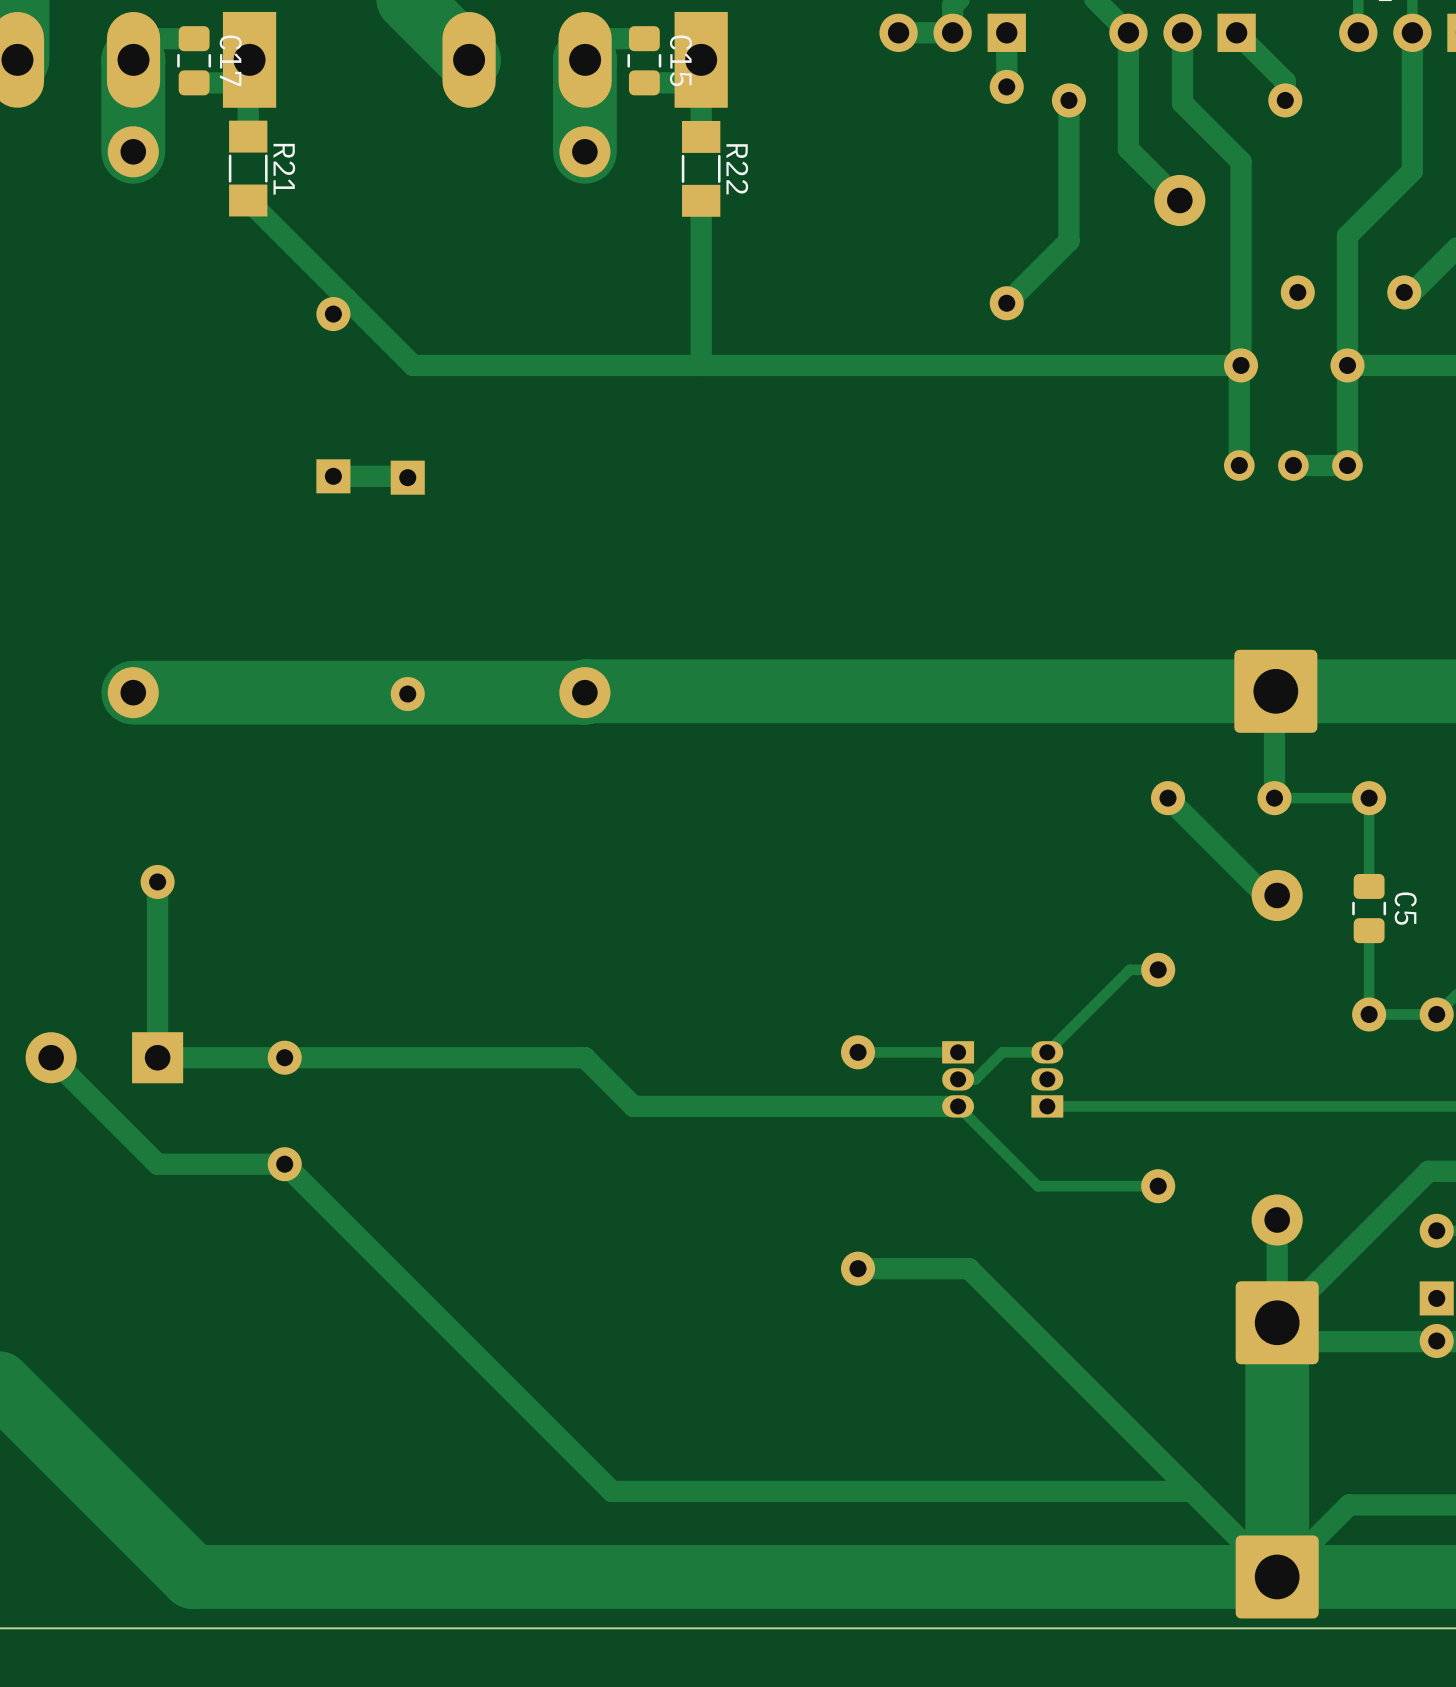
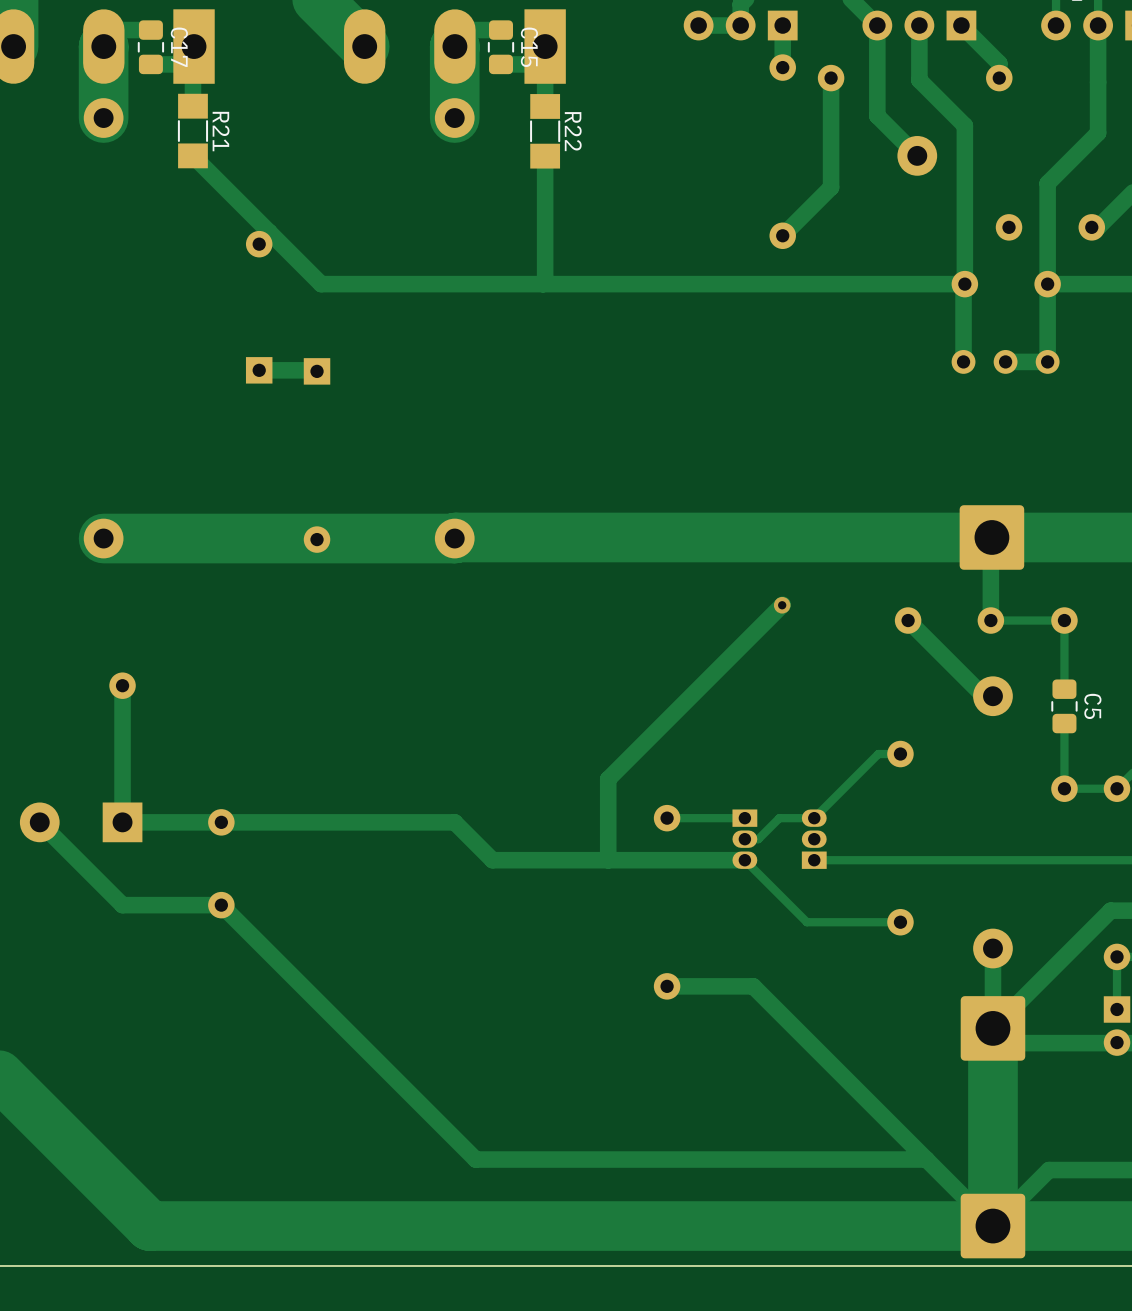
track: none -> (782, 604) (608, 779) (608, 860)
via: none -> (782, 605)
track: none -> (1117, 956) (1117, 1009)

